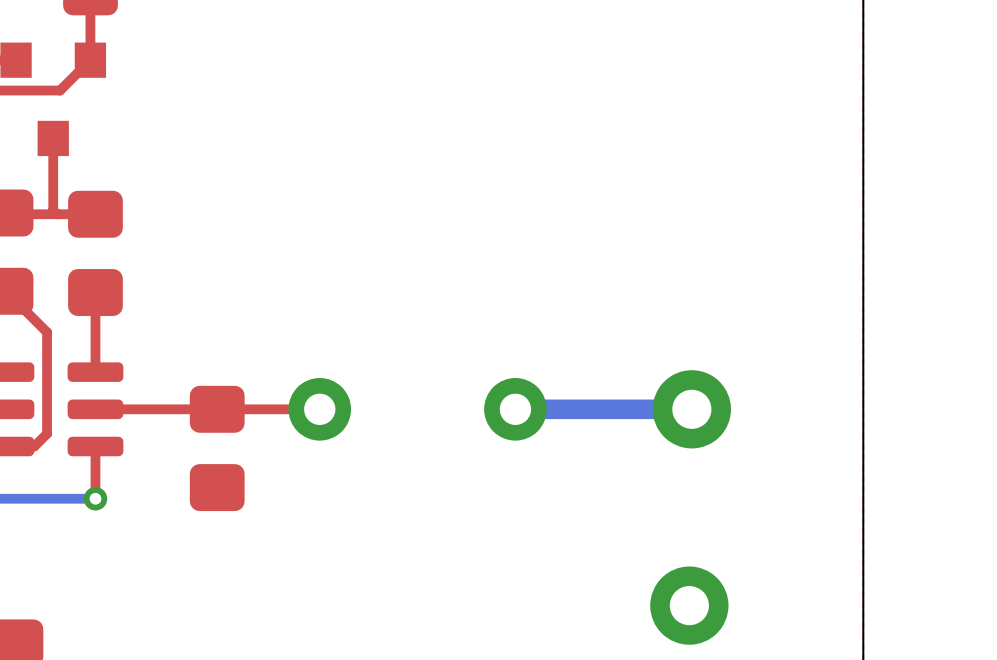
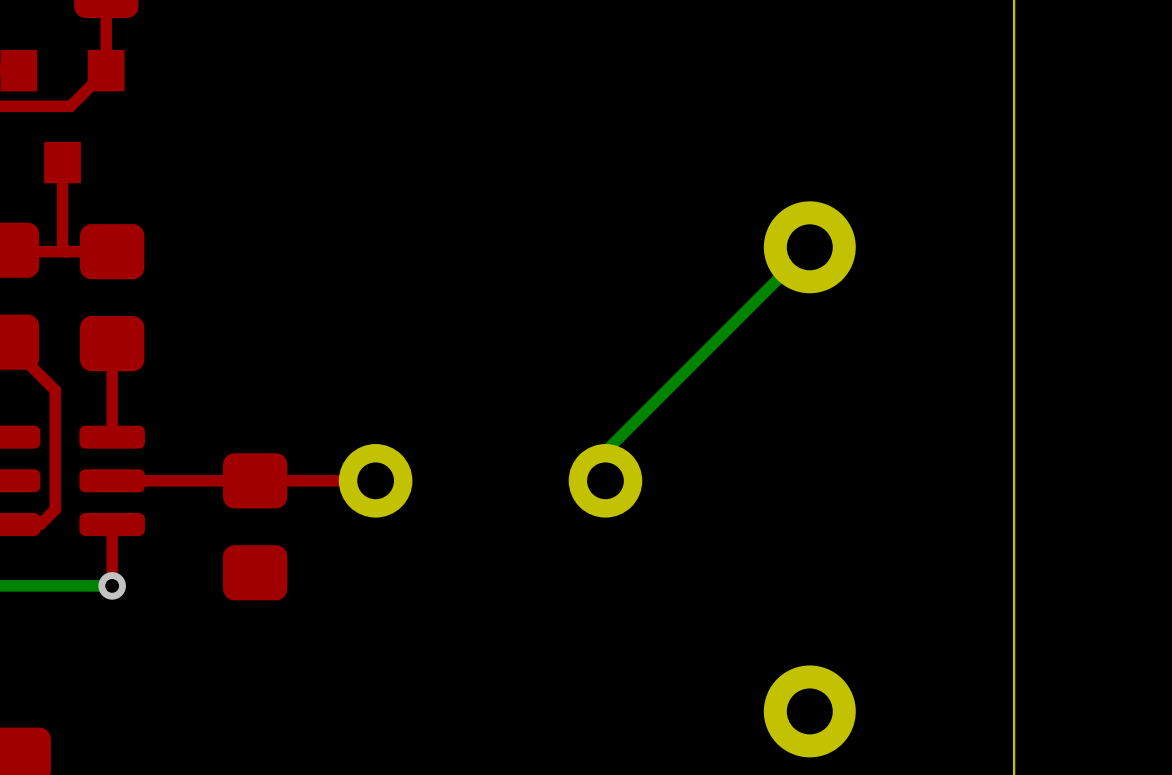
bottom track: (691, 409) (515, 409) -> (809, 247) (605, 451) (605, 480)
part position: (691, 409) -> (809, 247)

